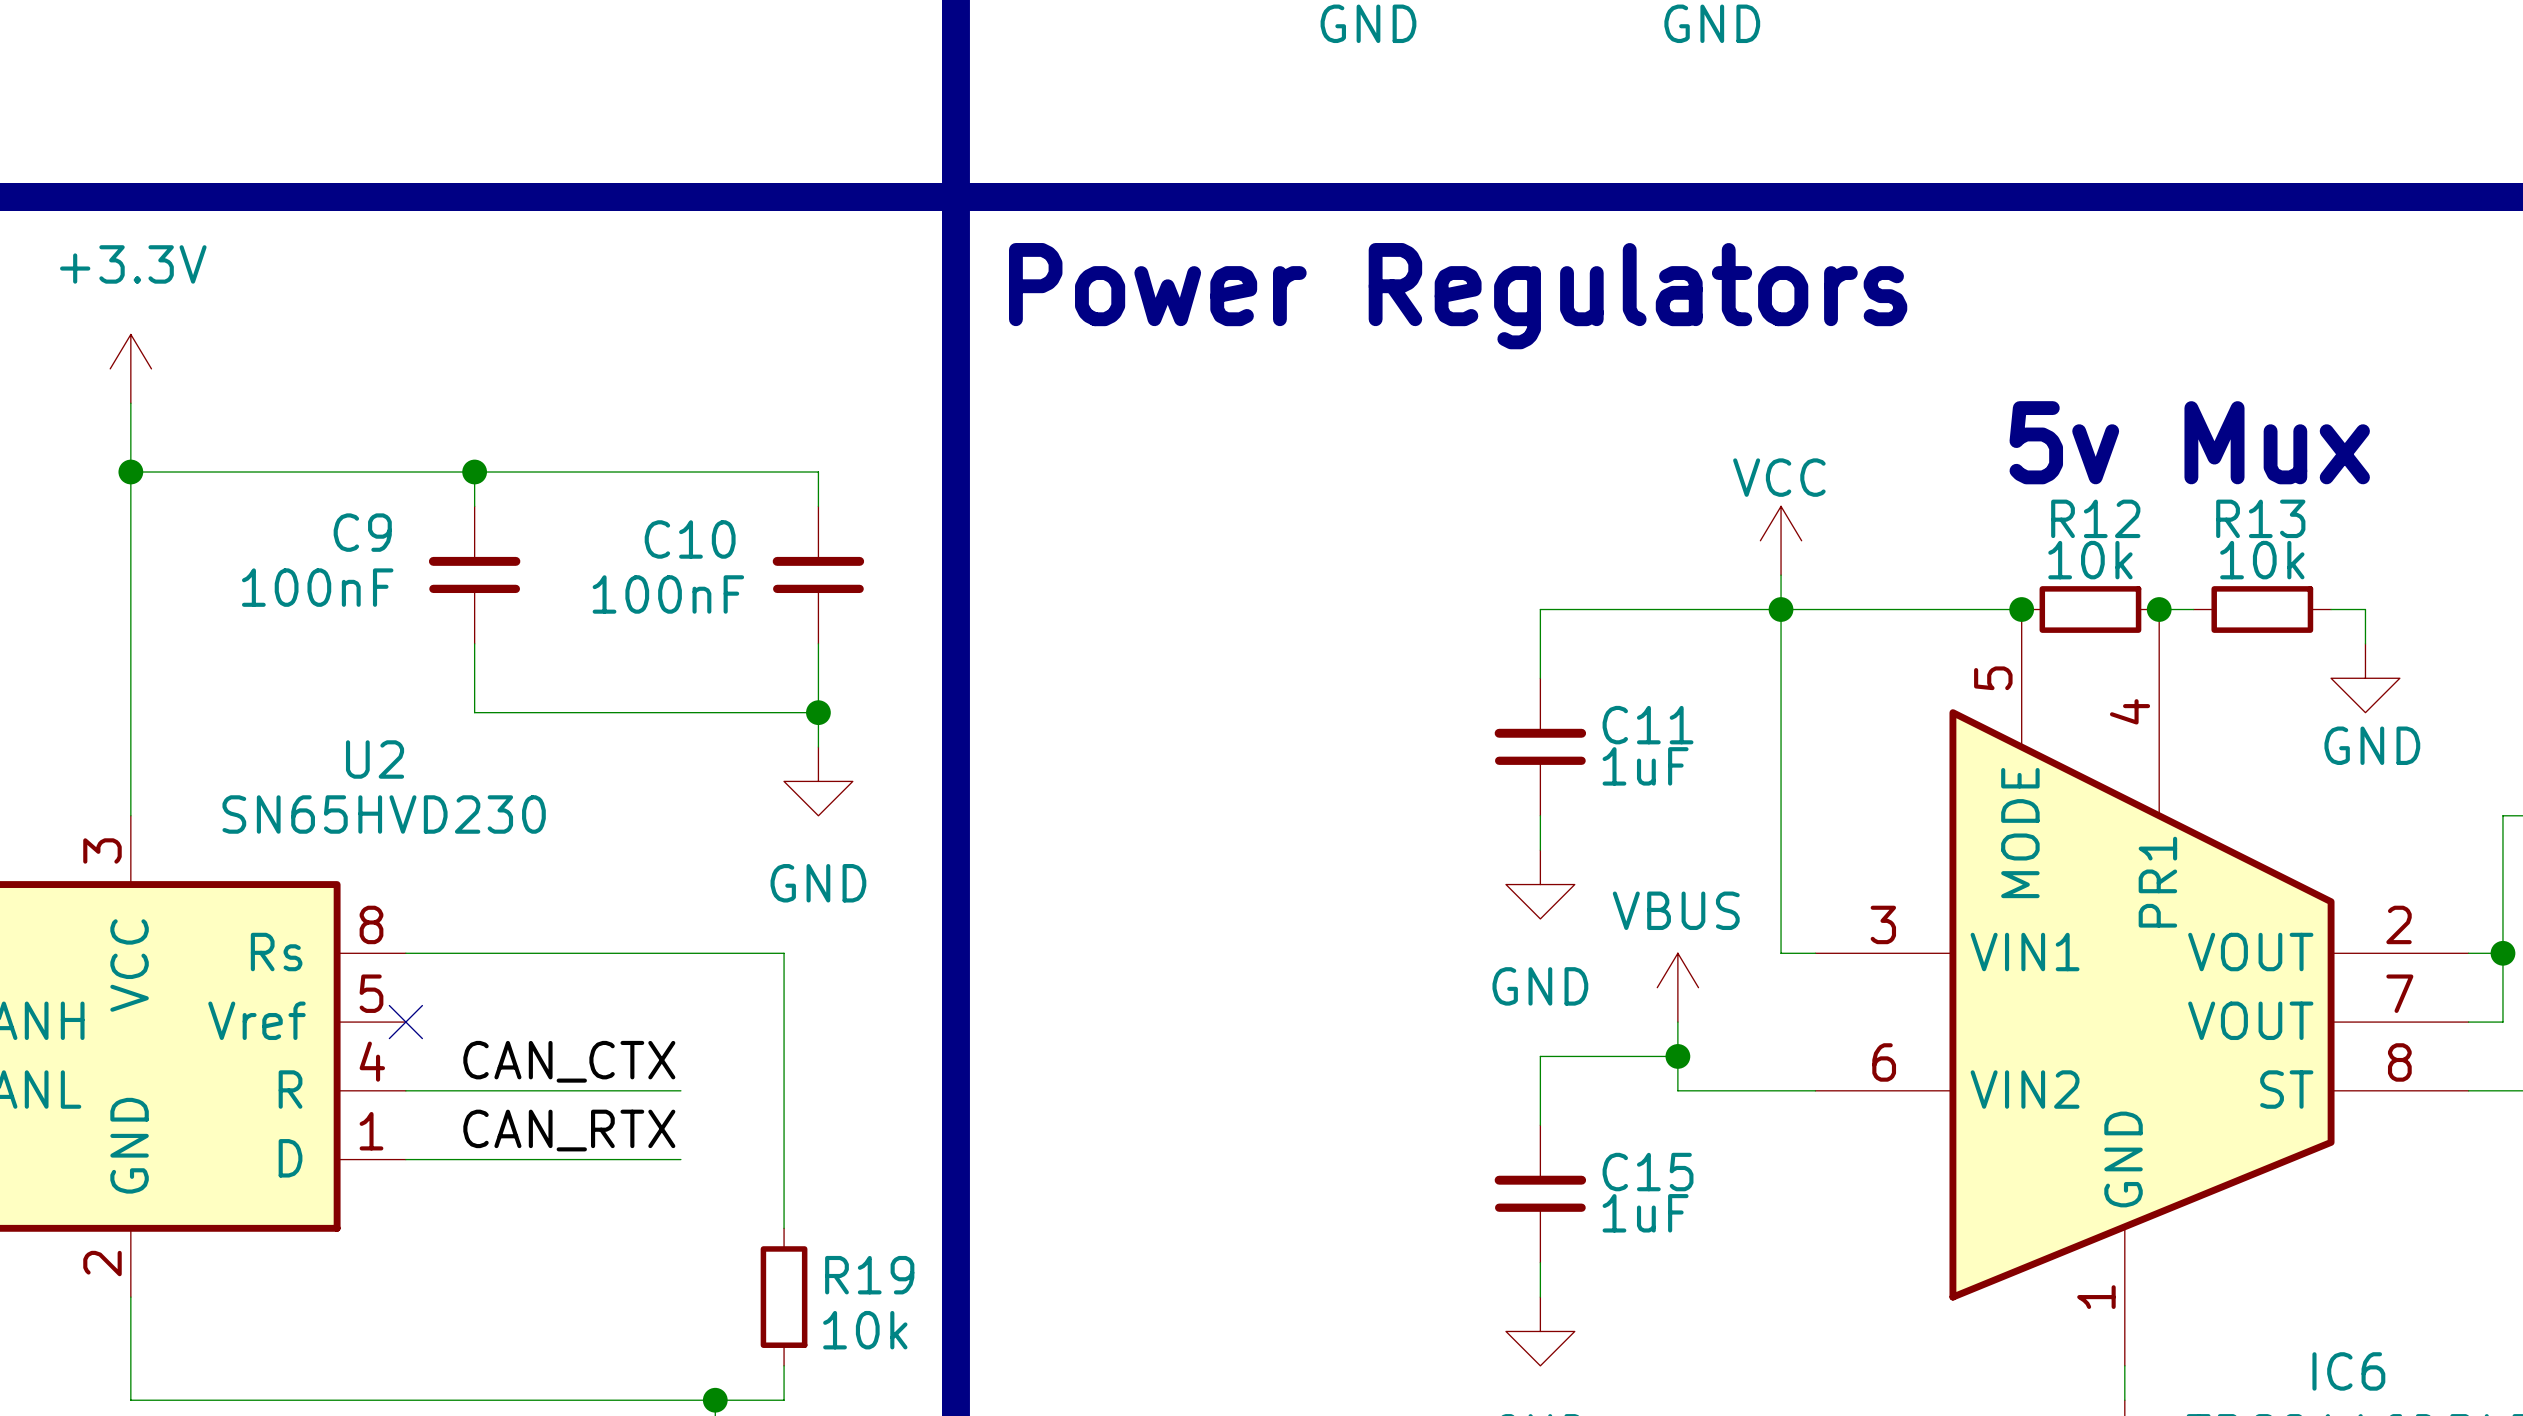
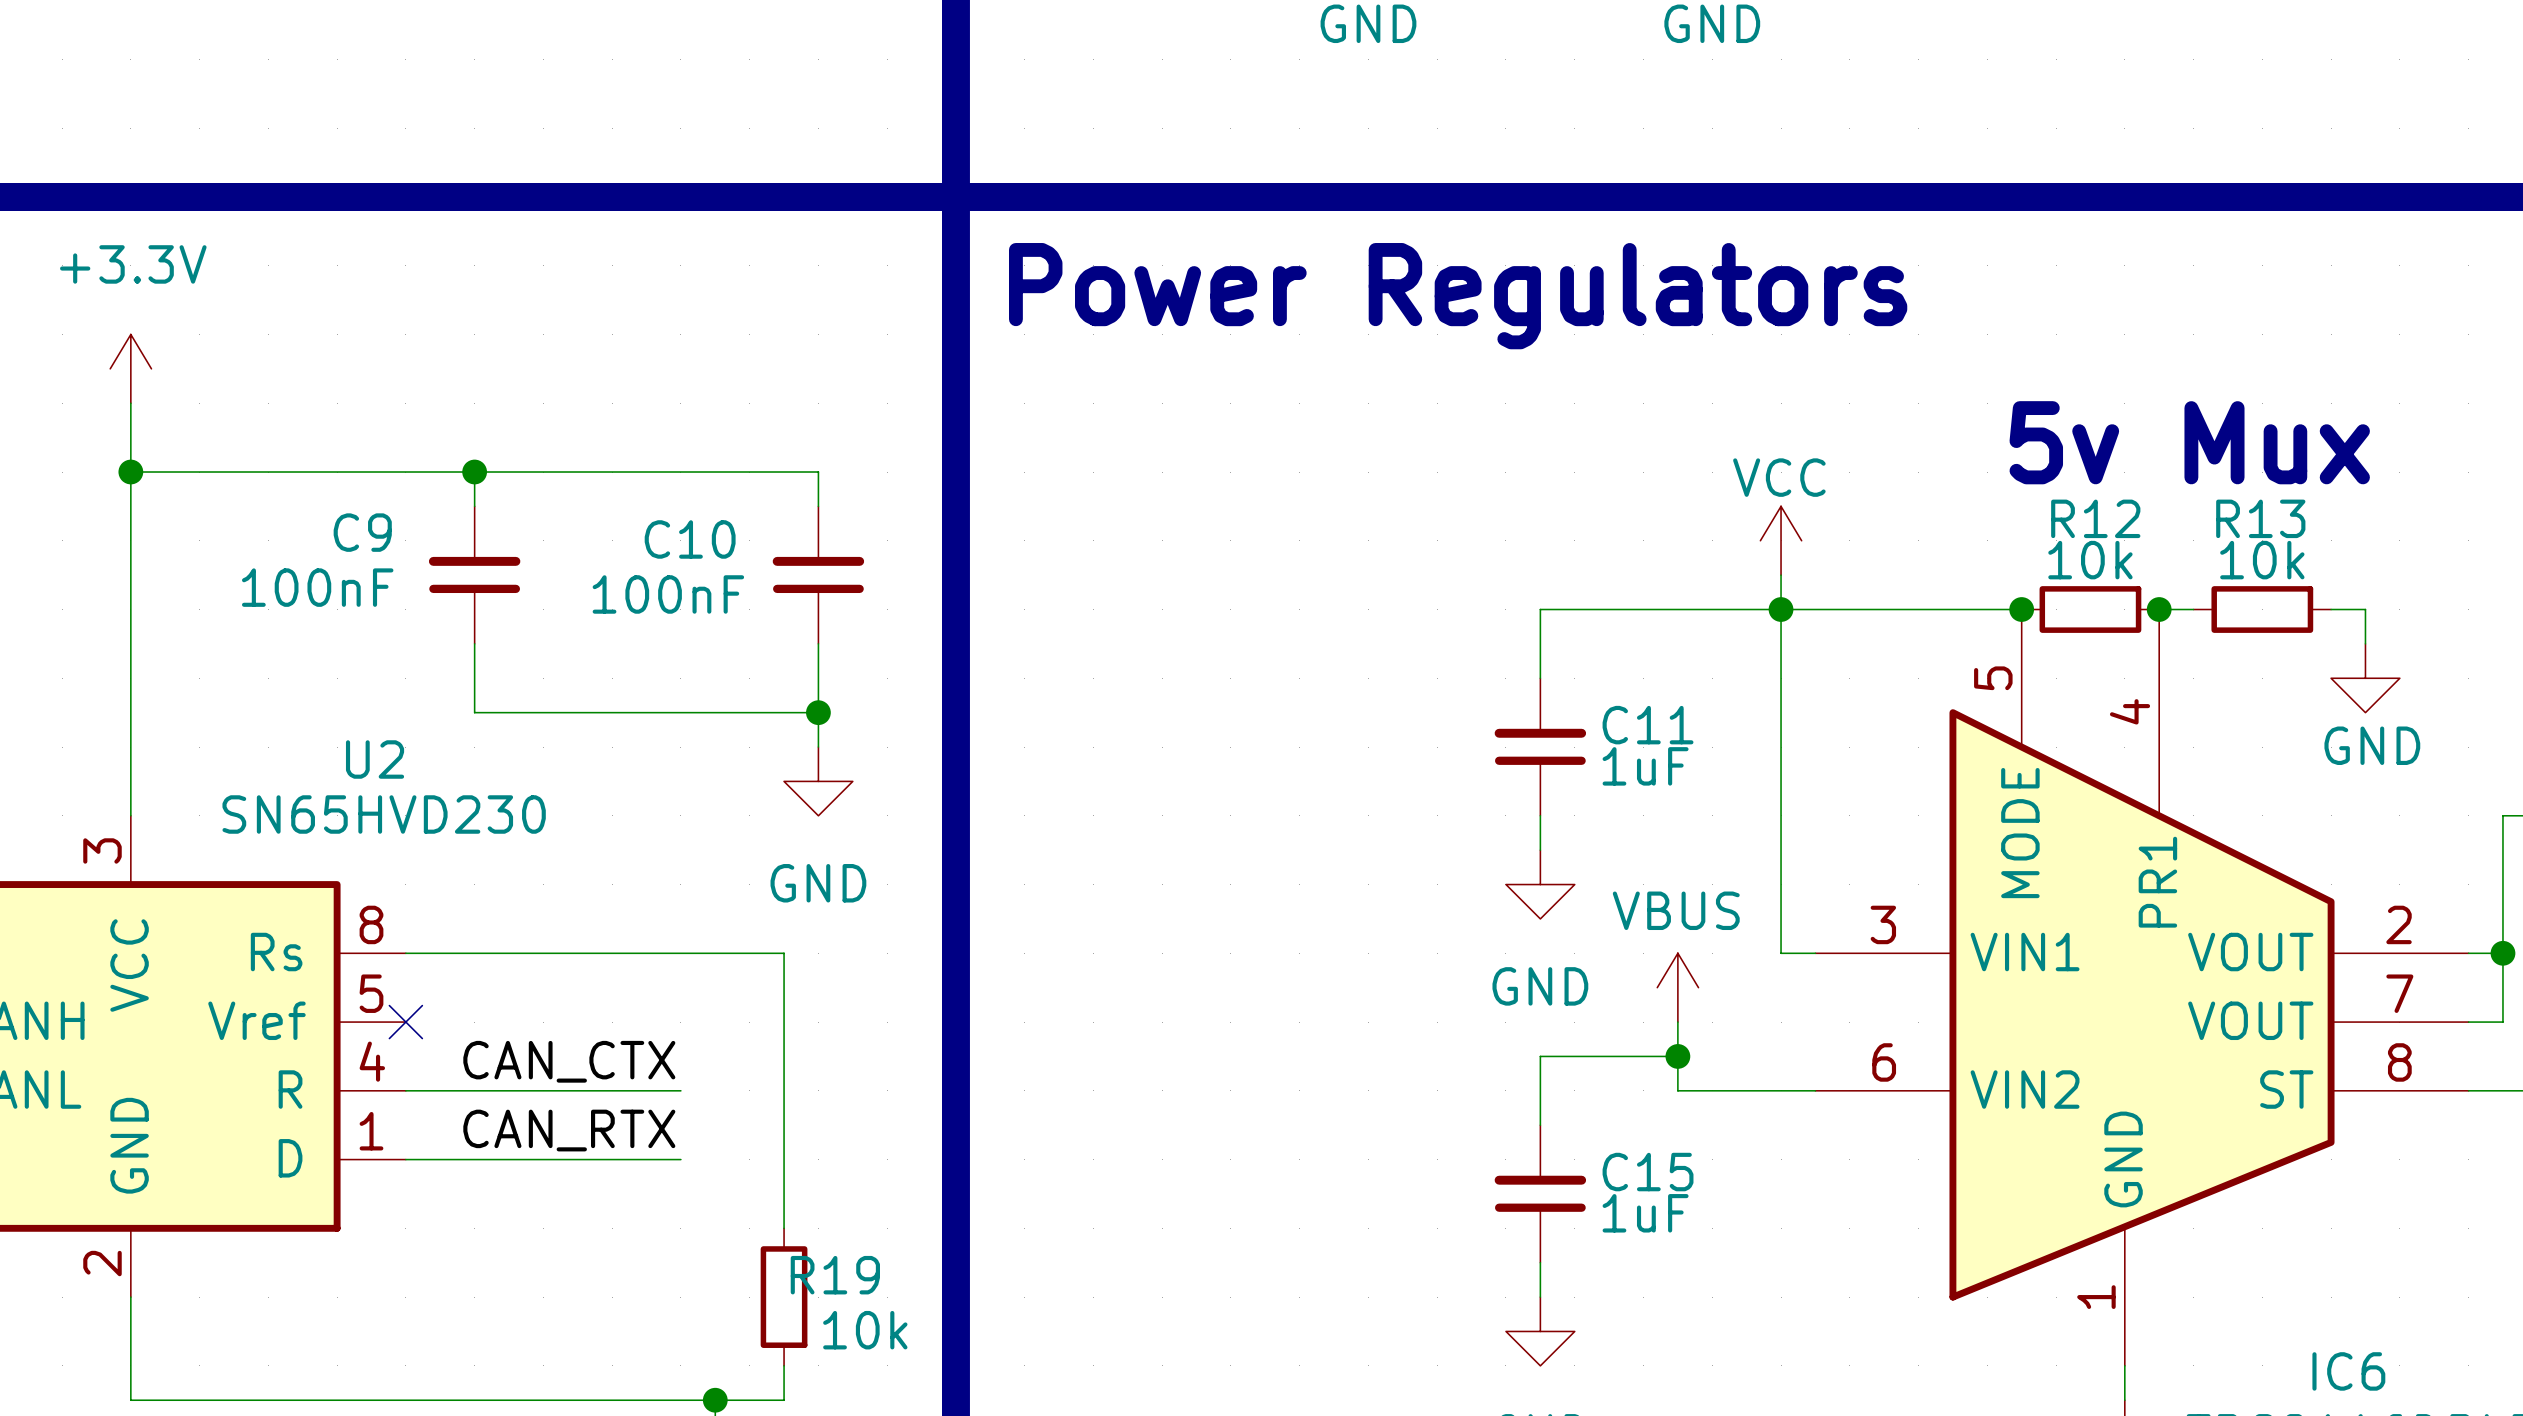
R19 name position: R19 (869, 1275) -> R19 (835, 1275)

